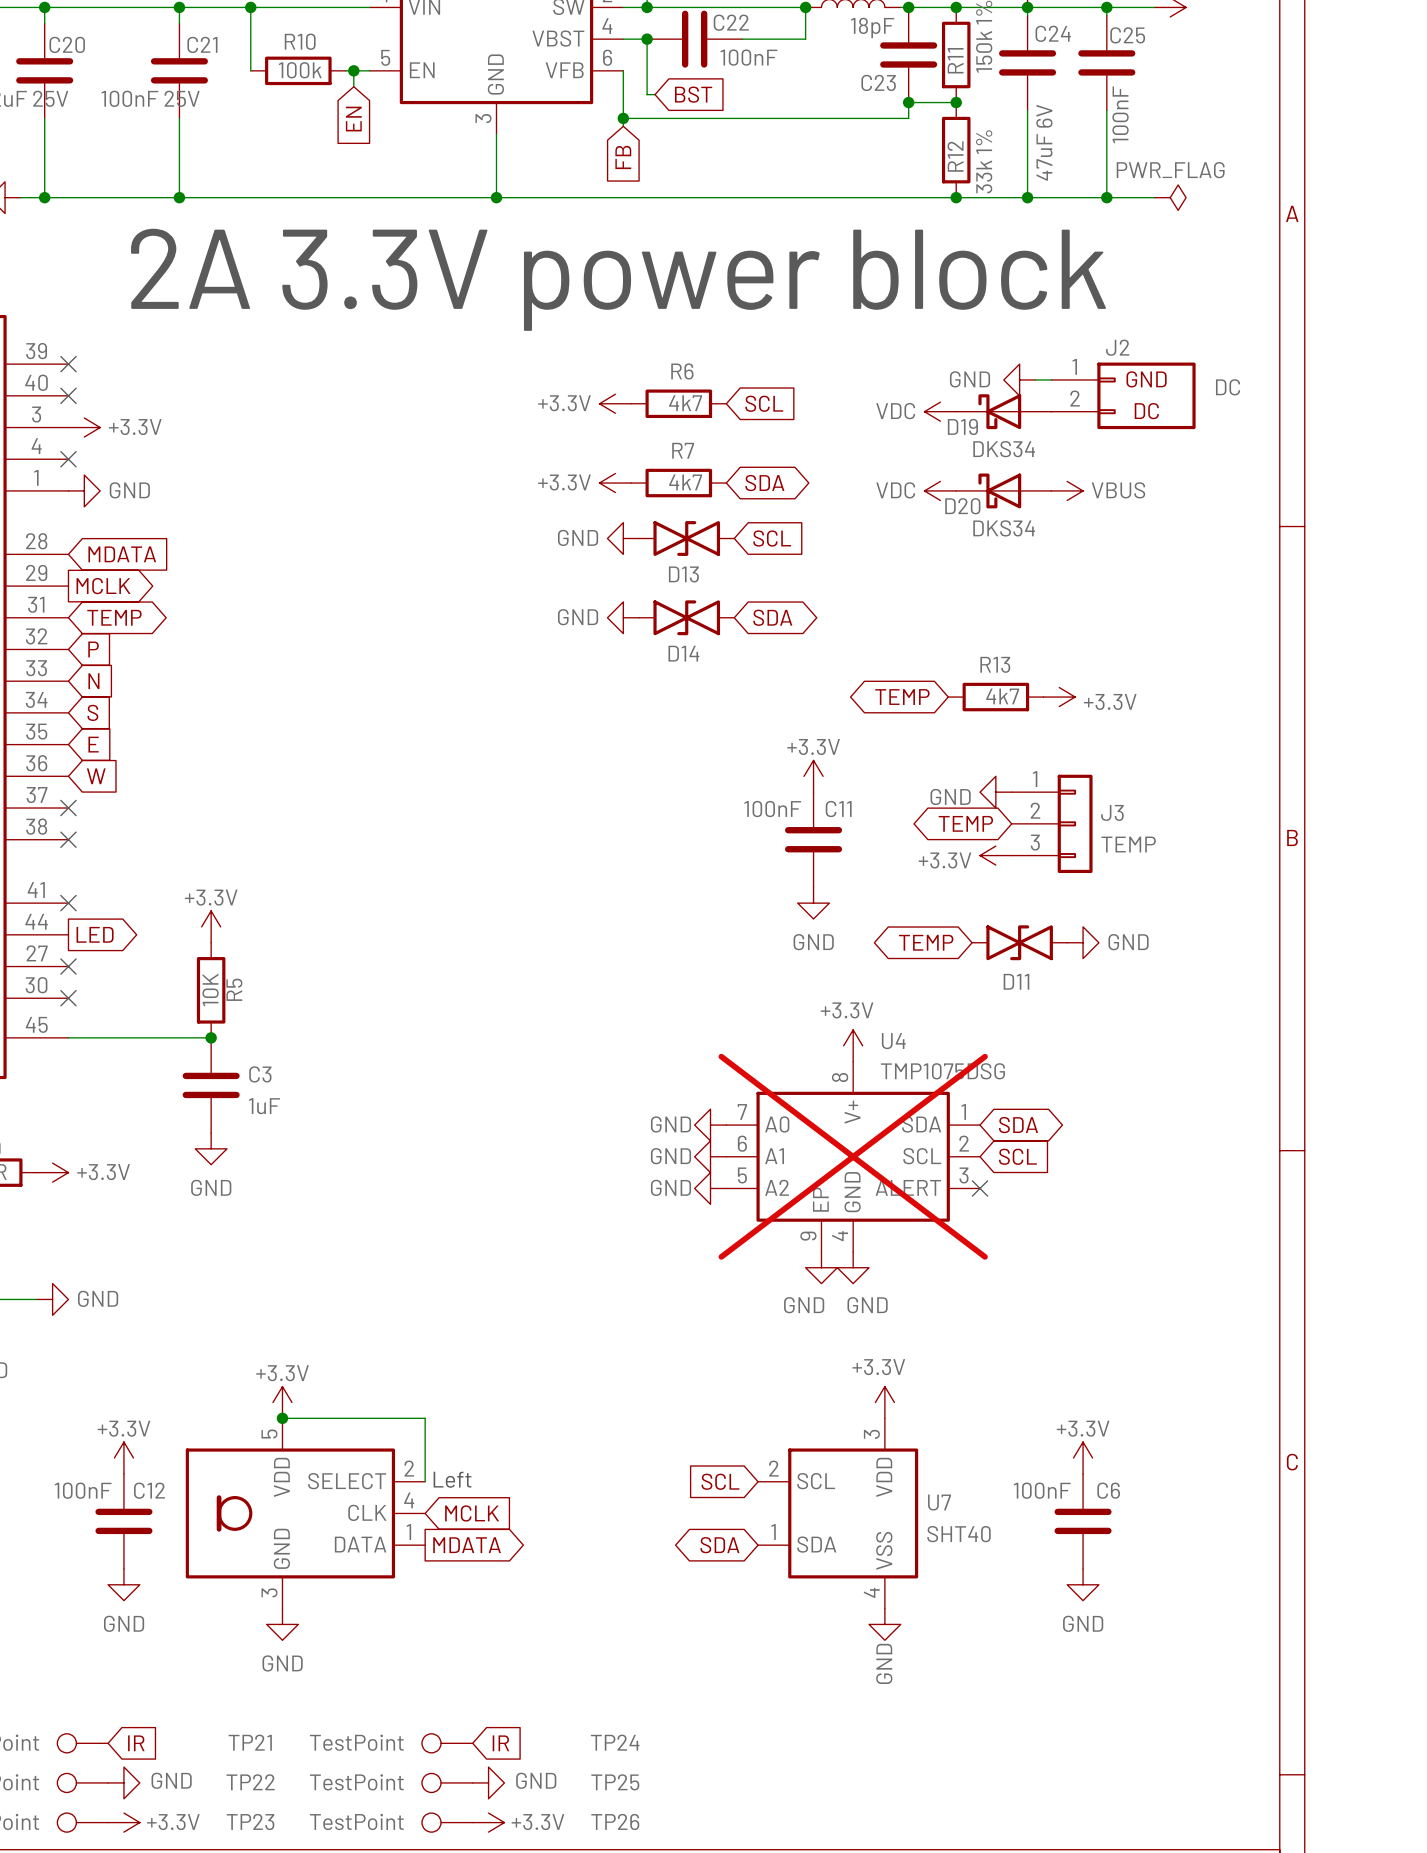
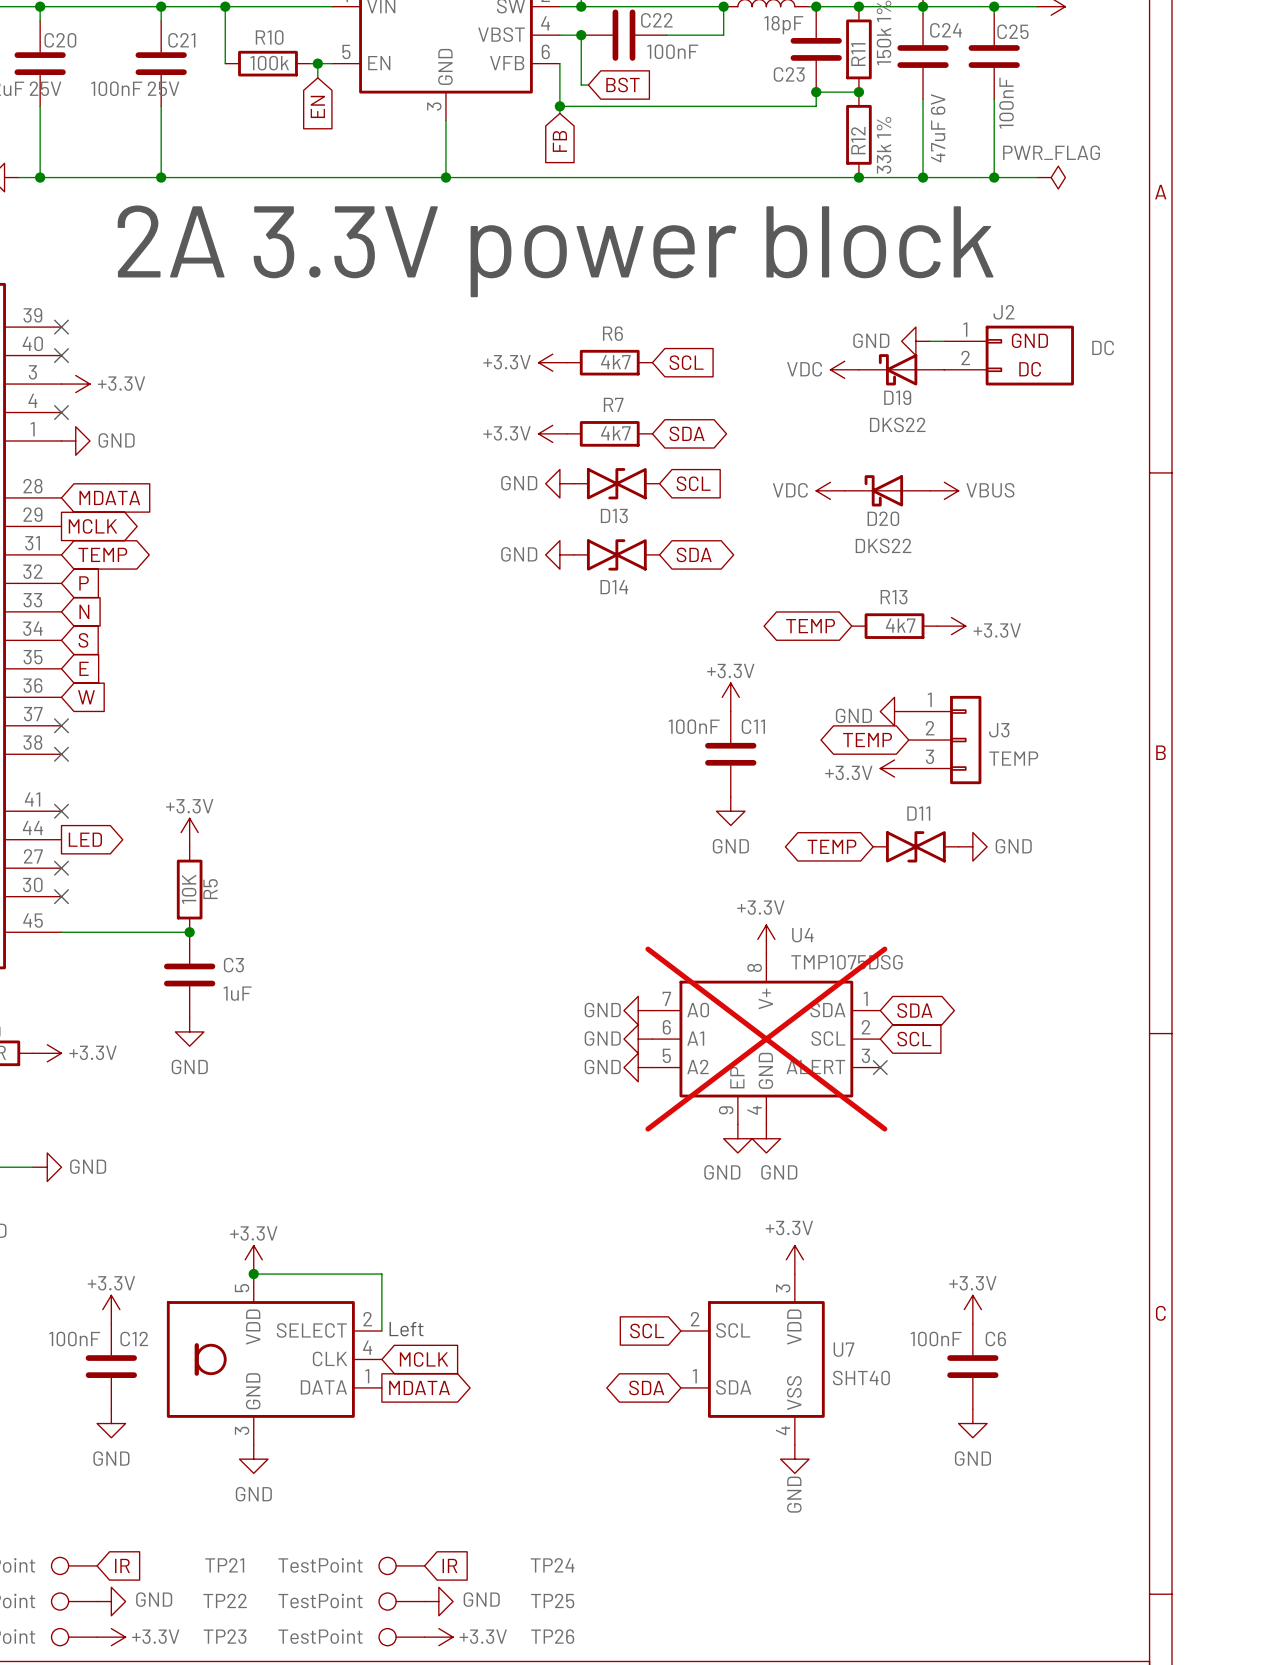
D19 name position: D19 (962, 426) -> D19 (897, 397)
D19 value: DKS34 (1004, 449) -> DKS22 (897, 424)
power symbol position: VDC (940, 490) -> VDC (830, 490)
D20 position: (1003, 490) -> (887, 490)
power symbol position: VBUS (1067, 490) -> VBUS (944, 490)
D20 name position: D20 (962, 506) -> D20 (883, 518)
D20 value: DKS34 (1004, 528) -> DKS22 (883, 545)
D11 name position: D11 (1016, 981) -> D11 (918, 813)

